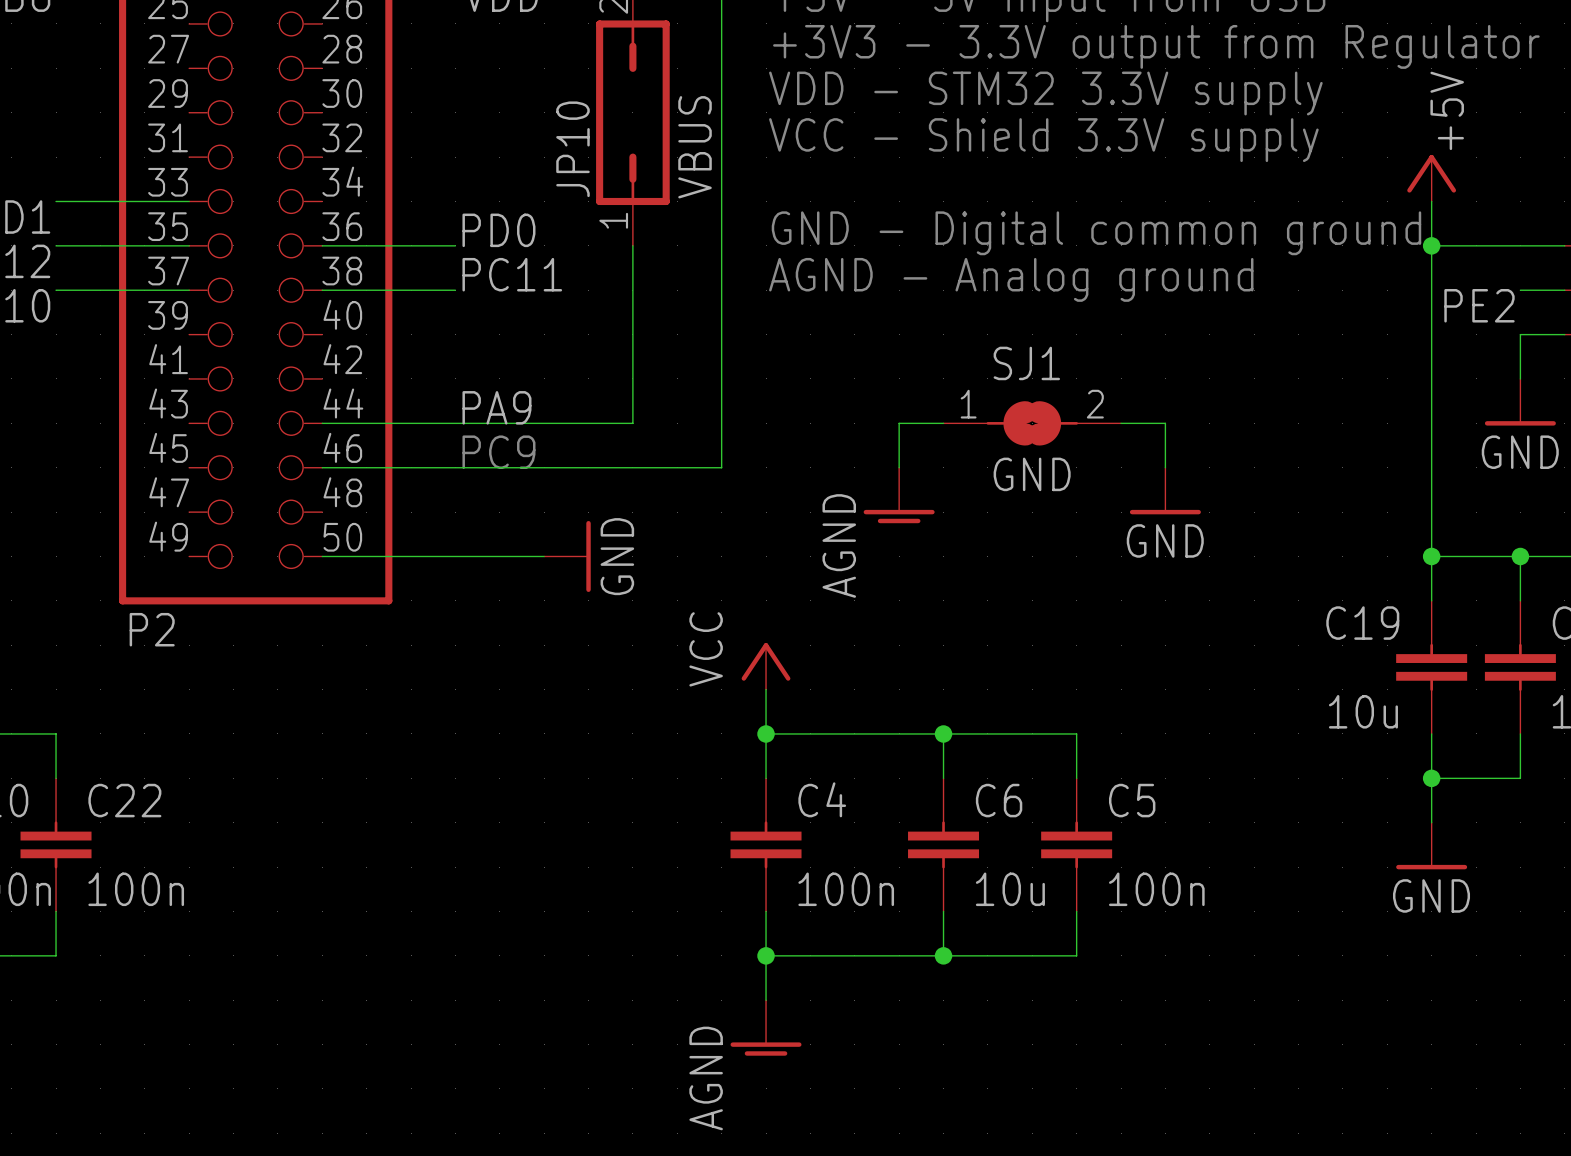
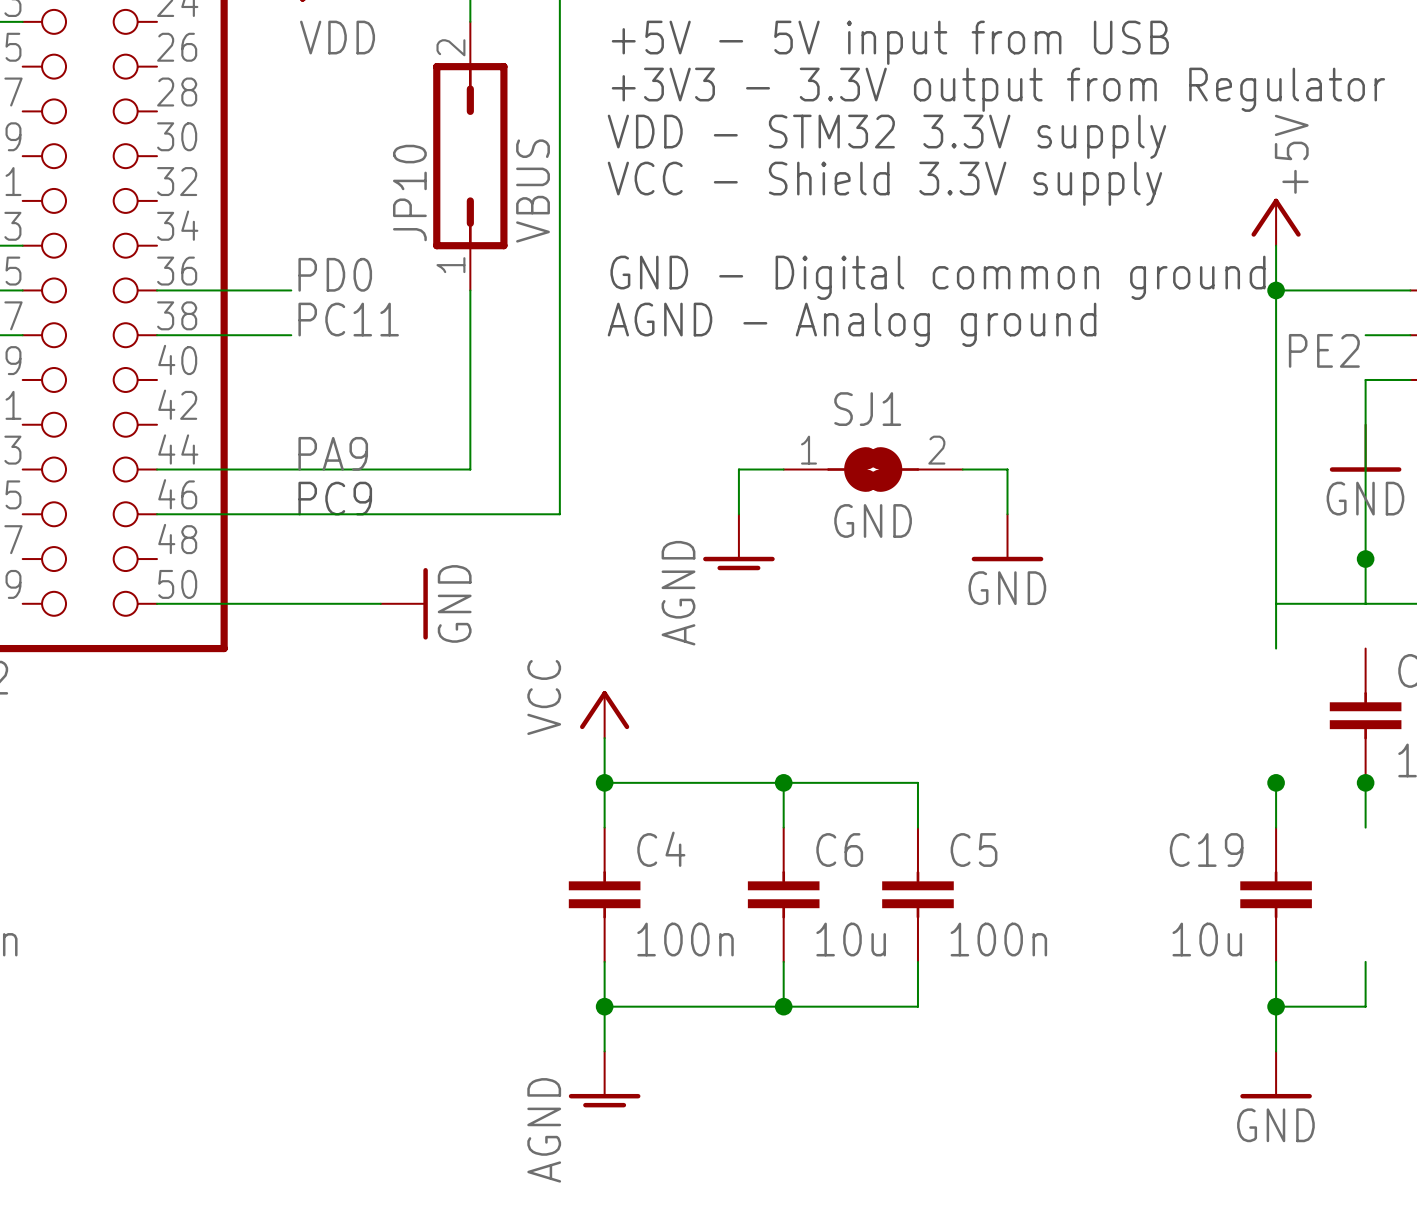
junction: (1431, 556) -> none
wire: (1520, 556) (1520, 600) -> (1365, 603) (1365, 424)
junction position: (1520, 556) -> (1365, 559)
C19 position: (1431, 667) -> (1276, 894)
junction: none -> (1365, 782)
junction position: (1431, 778) -> (1276, 782)
wire: (1520, 778) (1431, 778) (1431, 822) -> none
power symbol: GND (1431, 846) -> none
wire: none -> (1276, 961) (1276, 1051)
wire: none -> (1365, 961) (1365, 1006) (1276, 1006)
junction: none -> (1276, 1006)
power symbol: none -> GND (1276, 1074)

